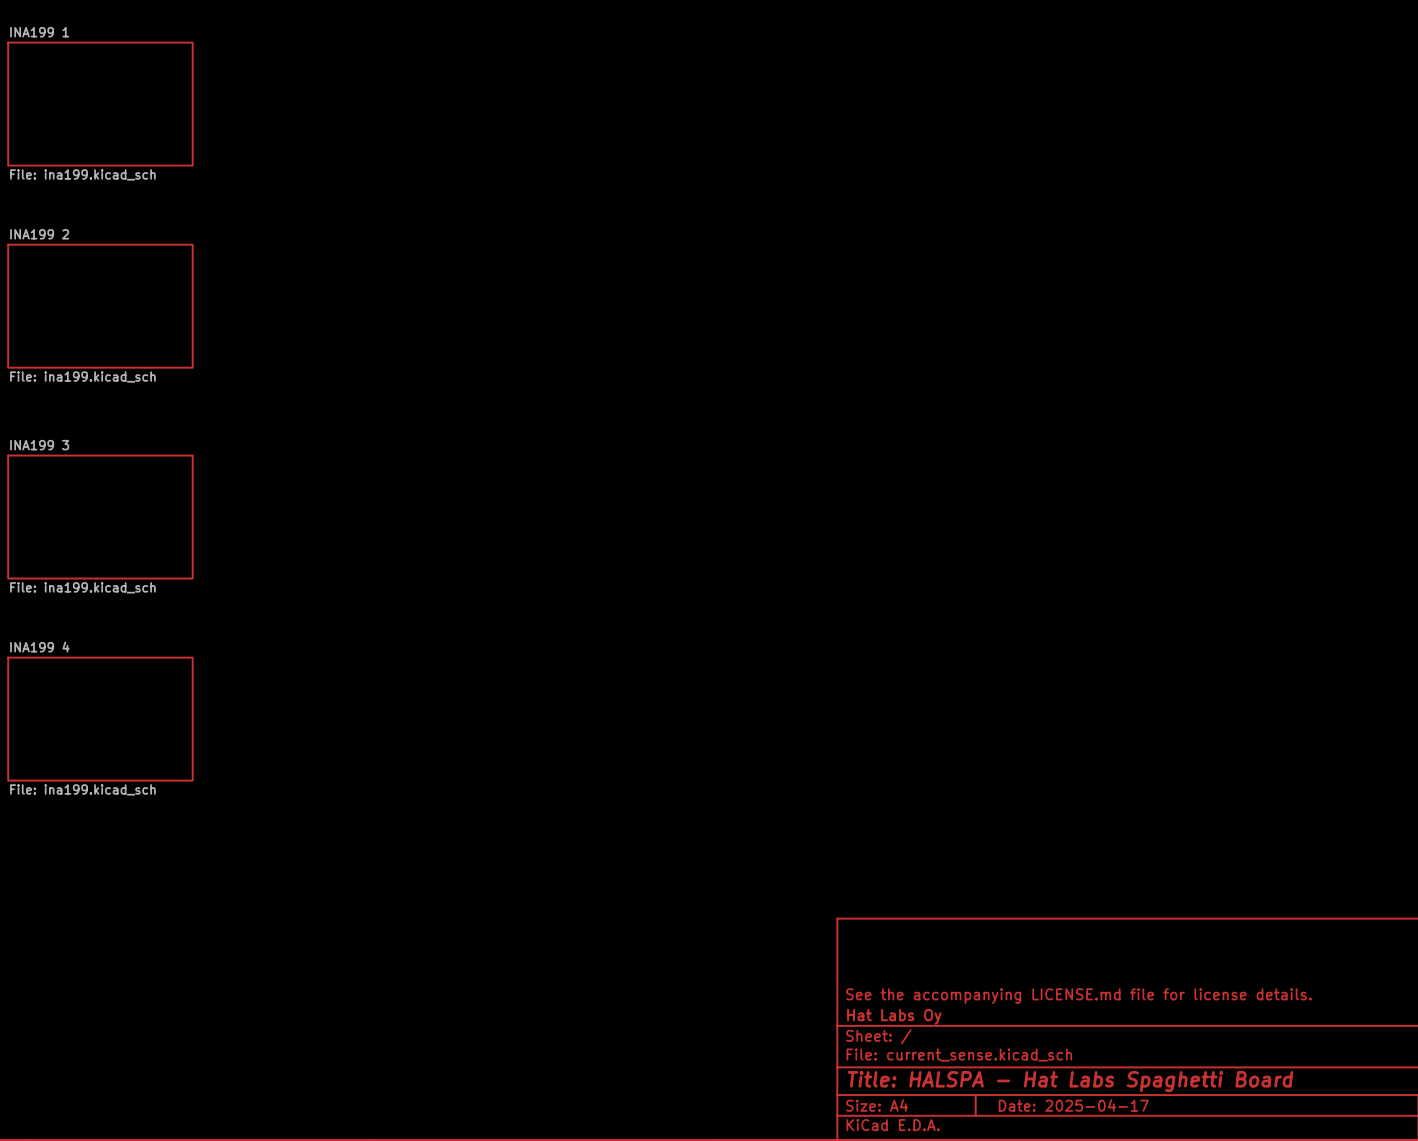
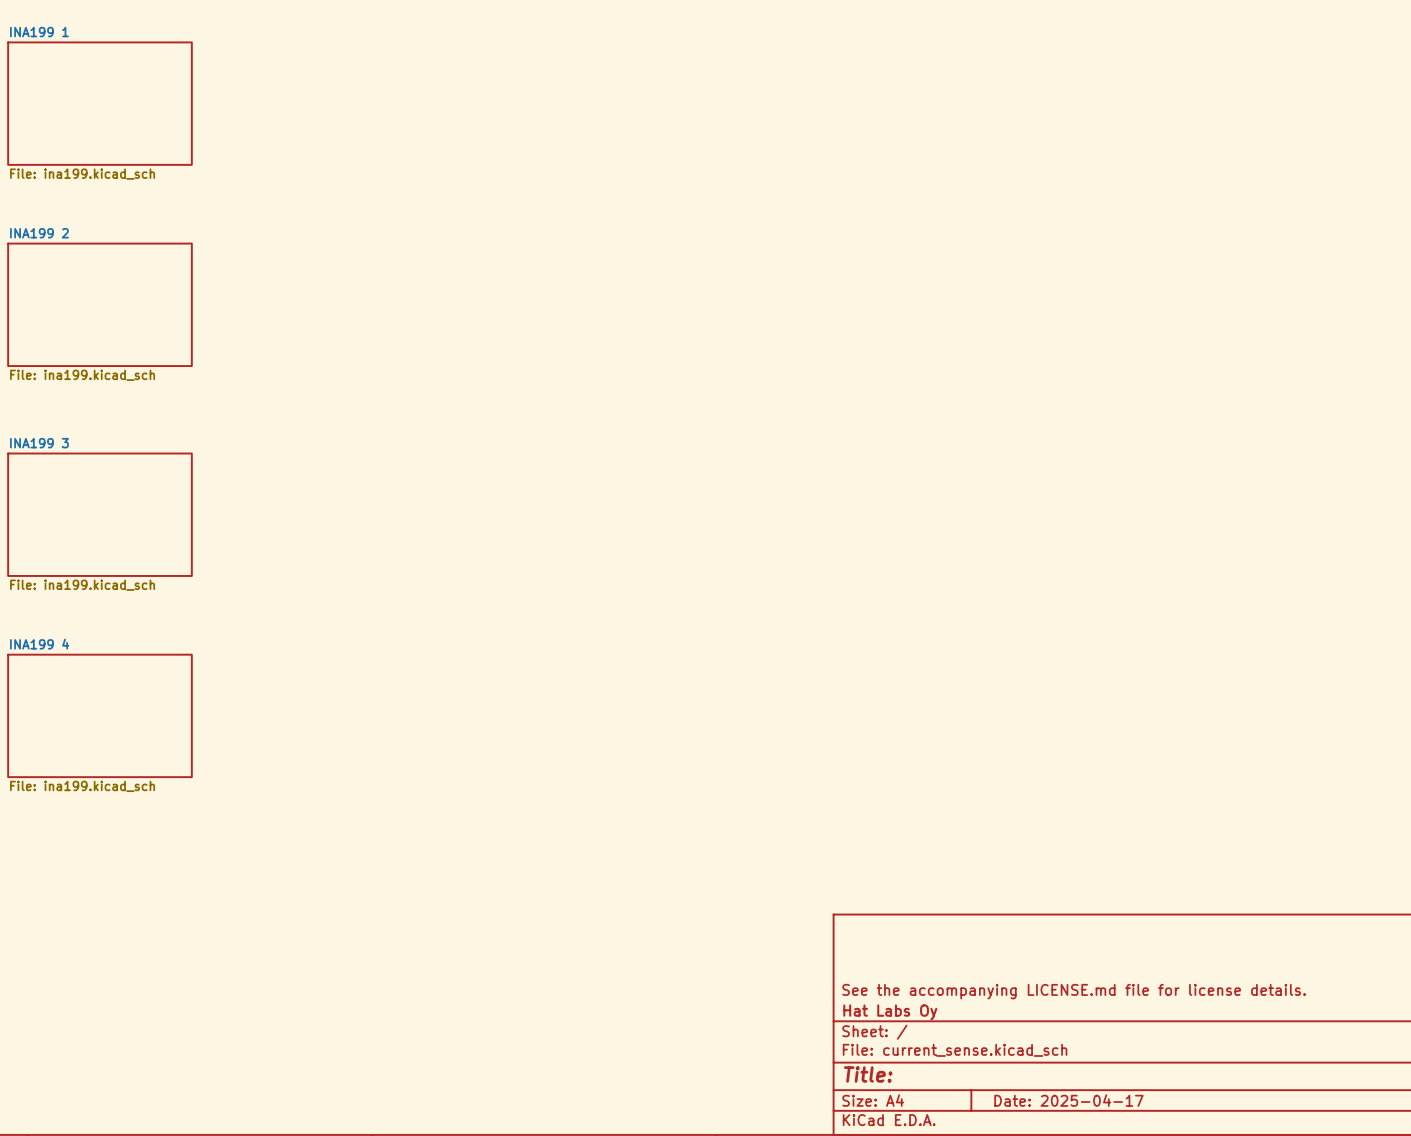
title block: Title: HALSPA - Hat Labs Spaghetti Board (1070, 1081) -> Title: (868, 1074)

